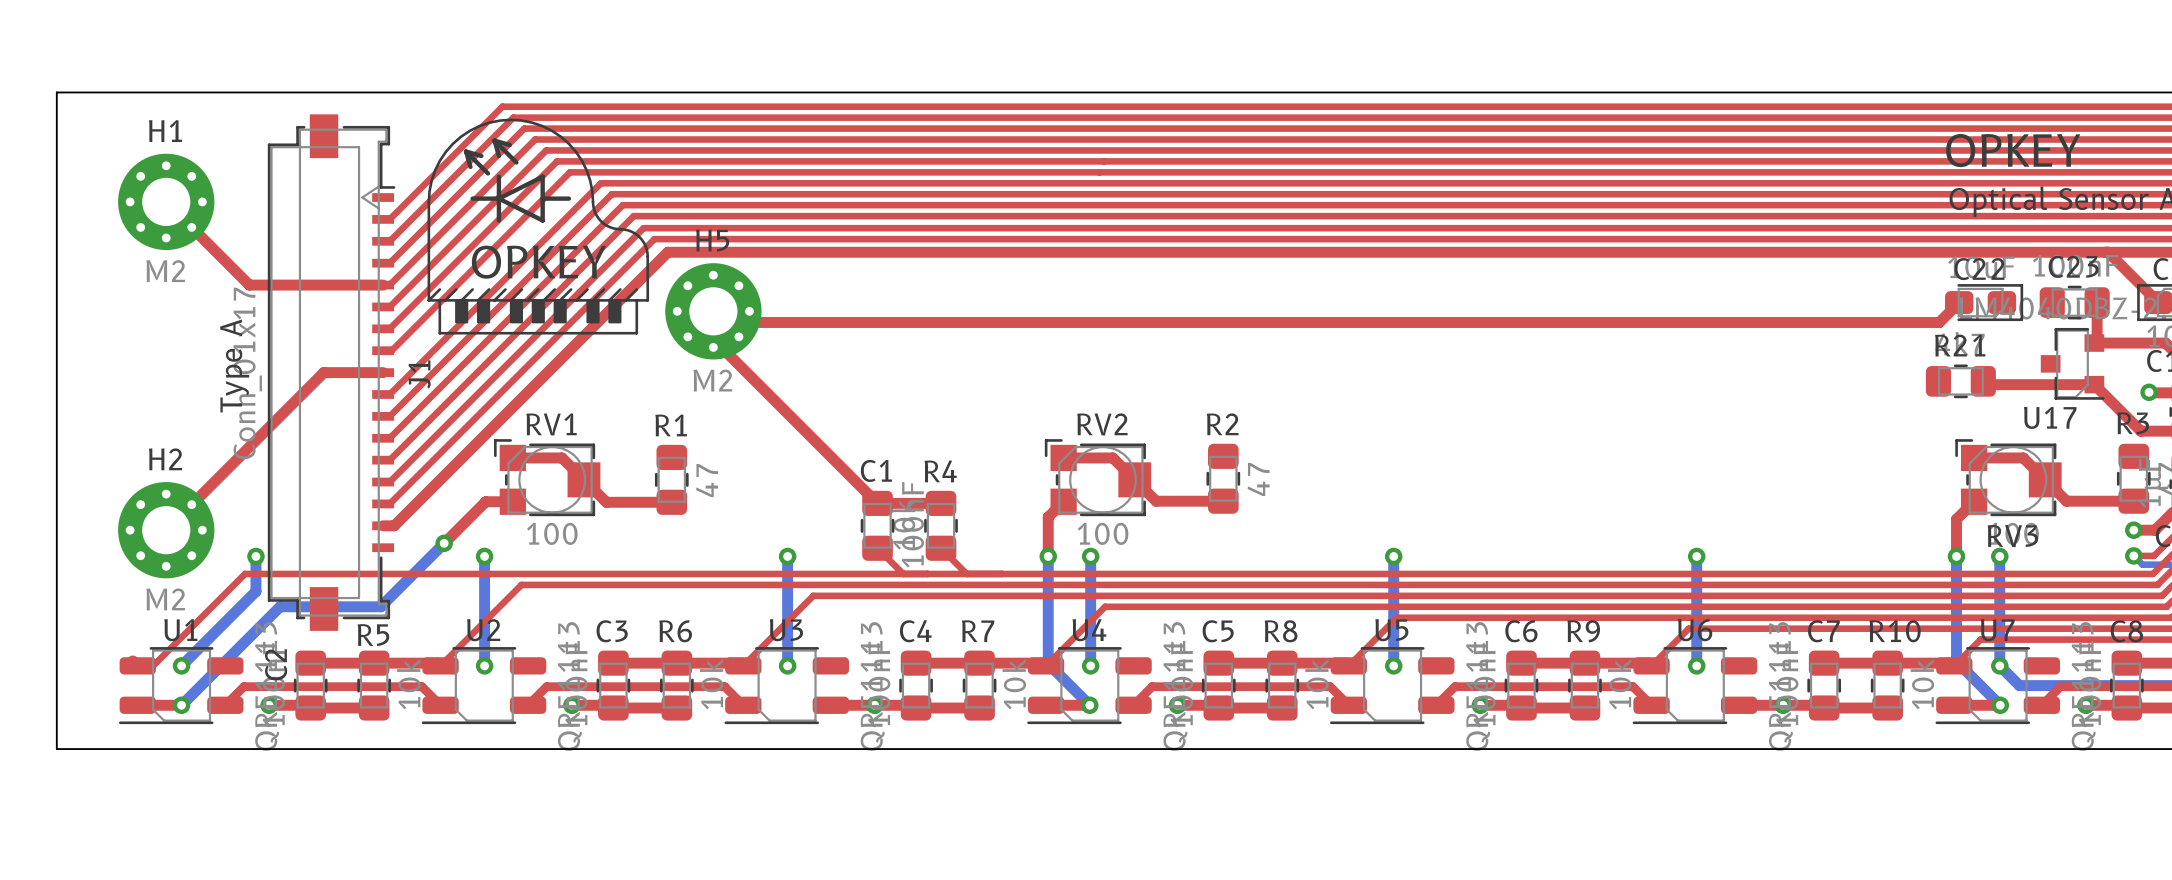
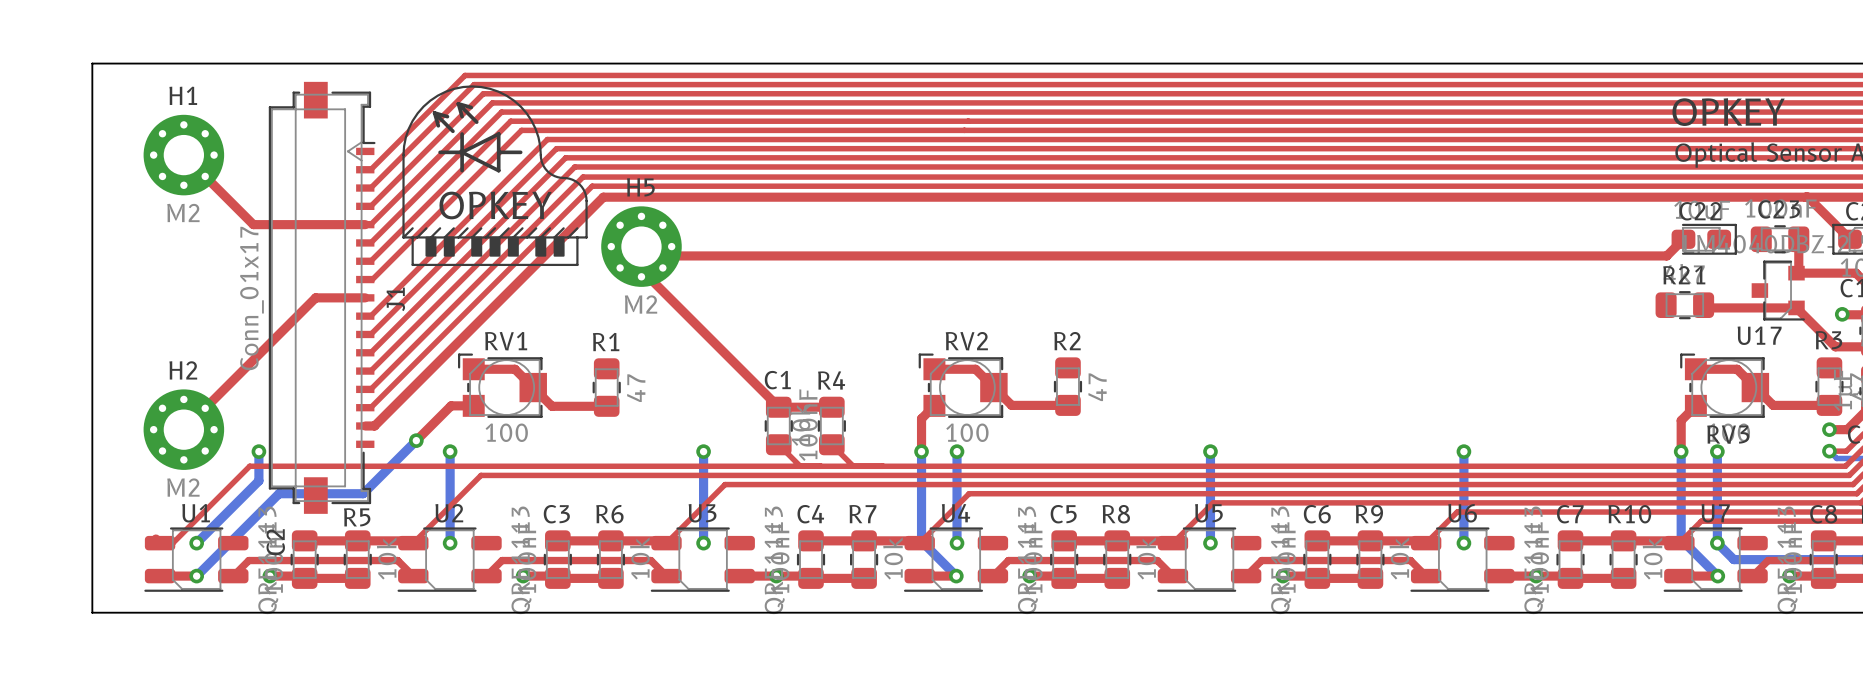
text: Type A (234, 365) -> none

